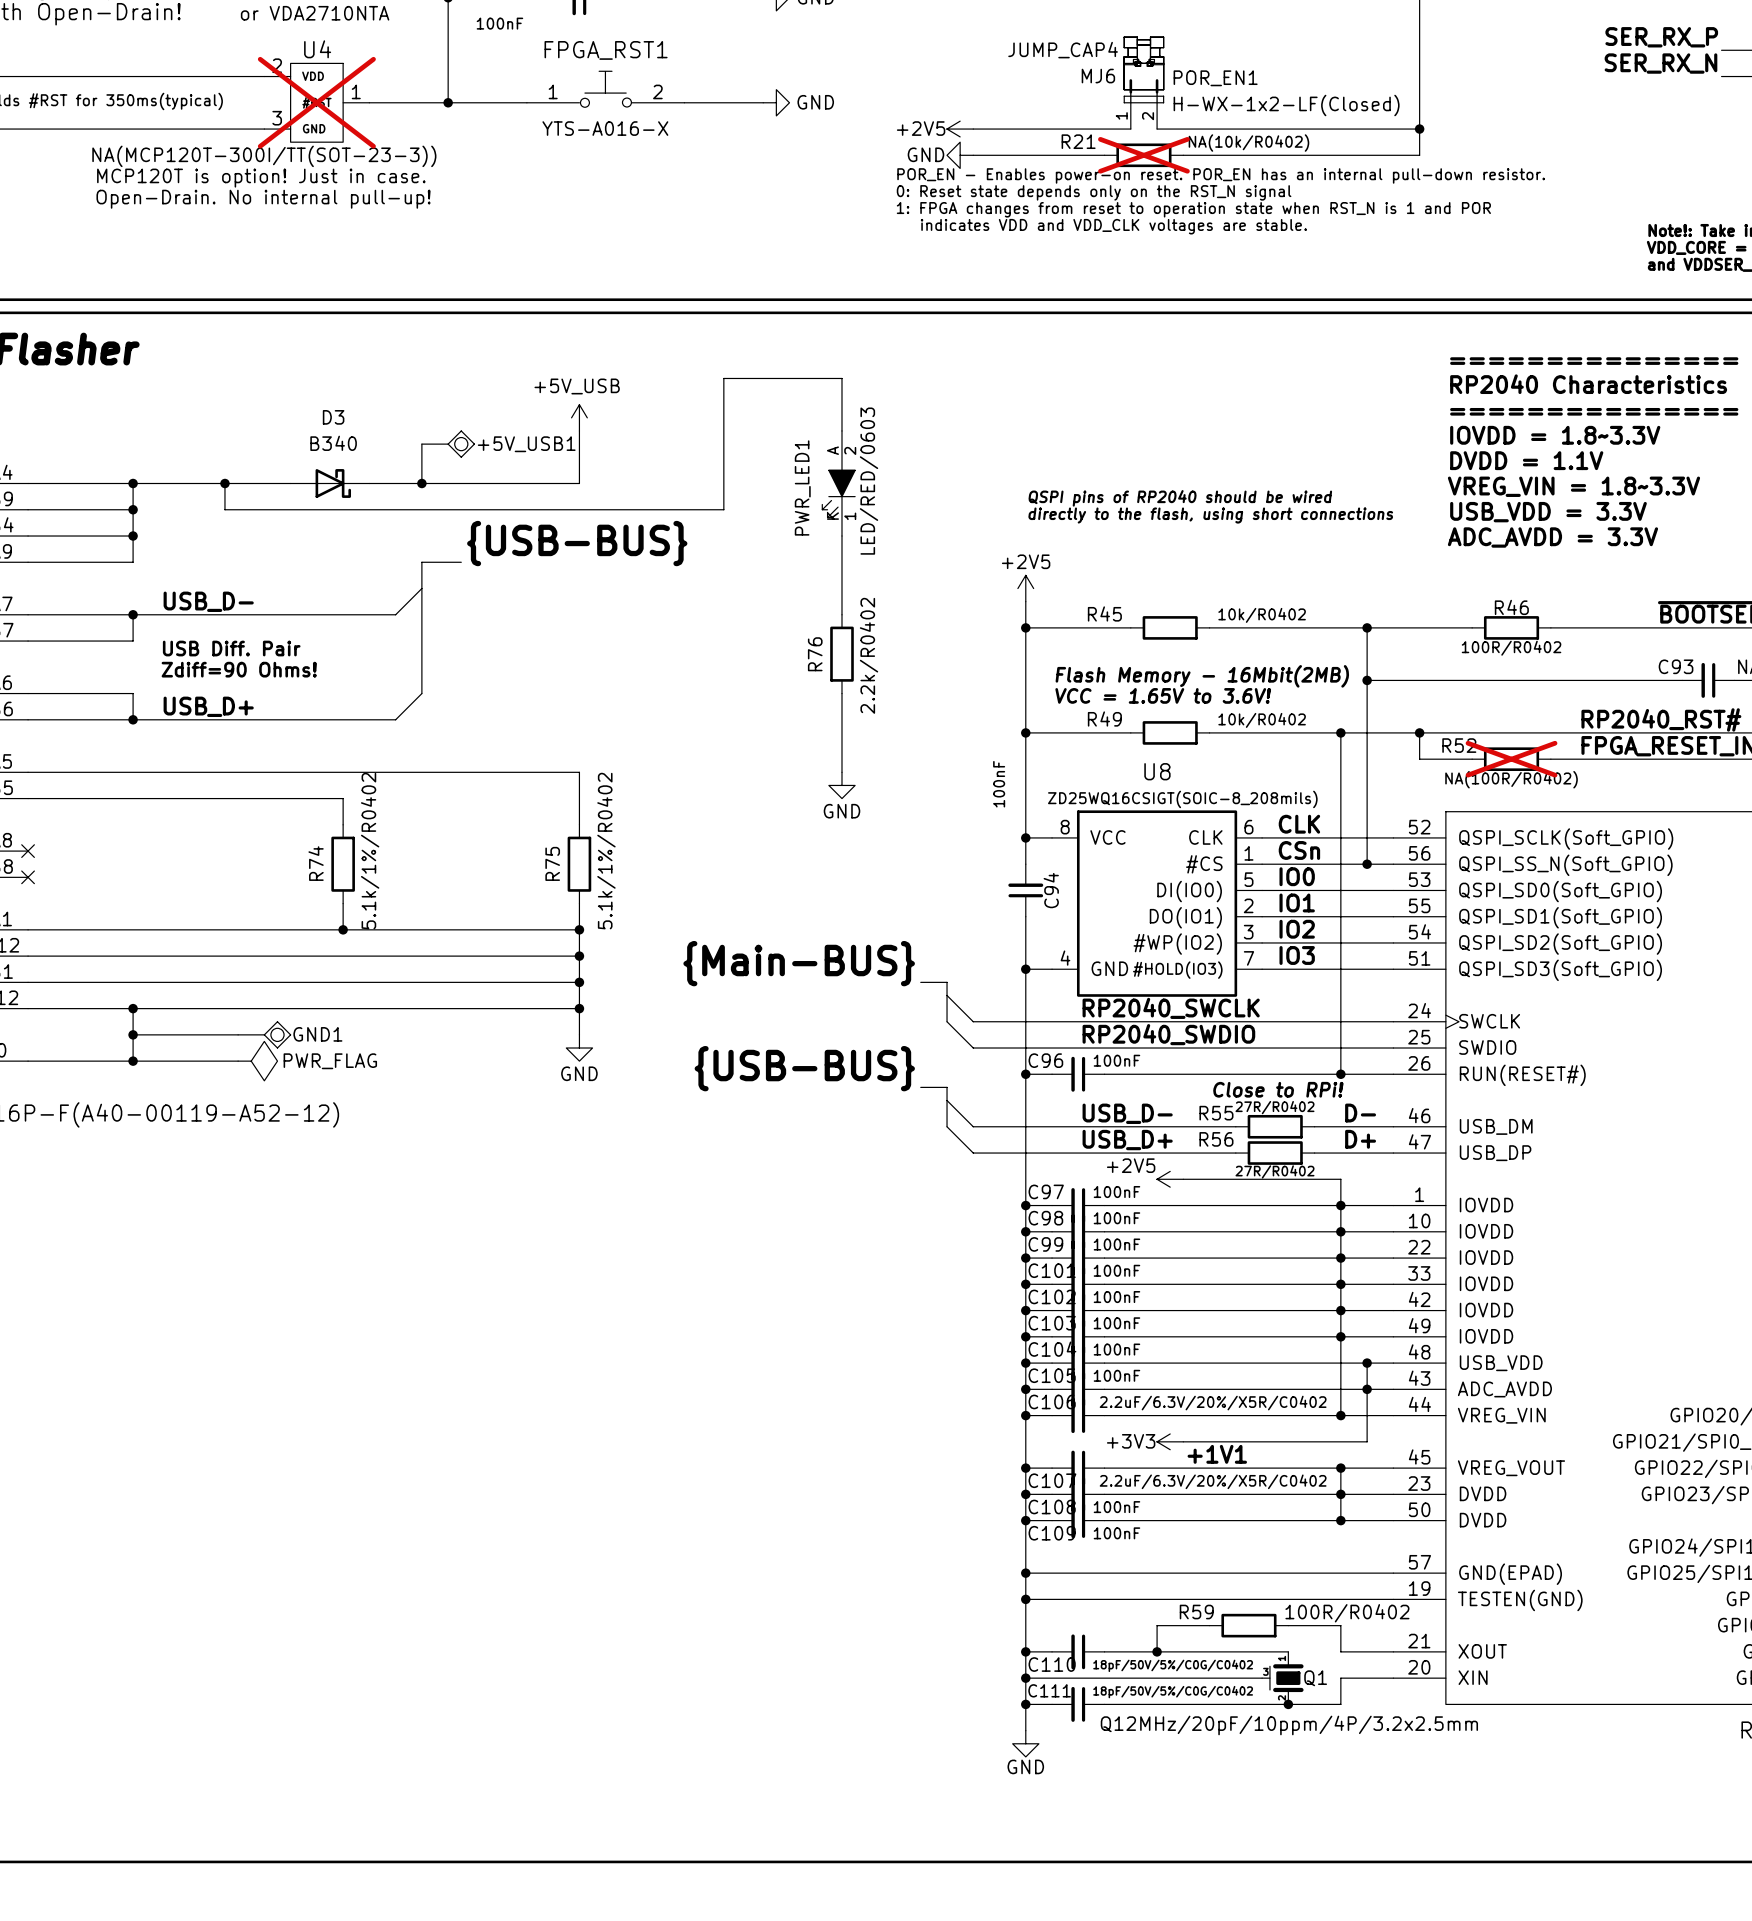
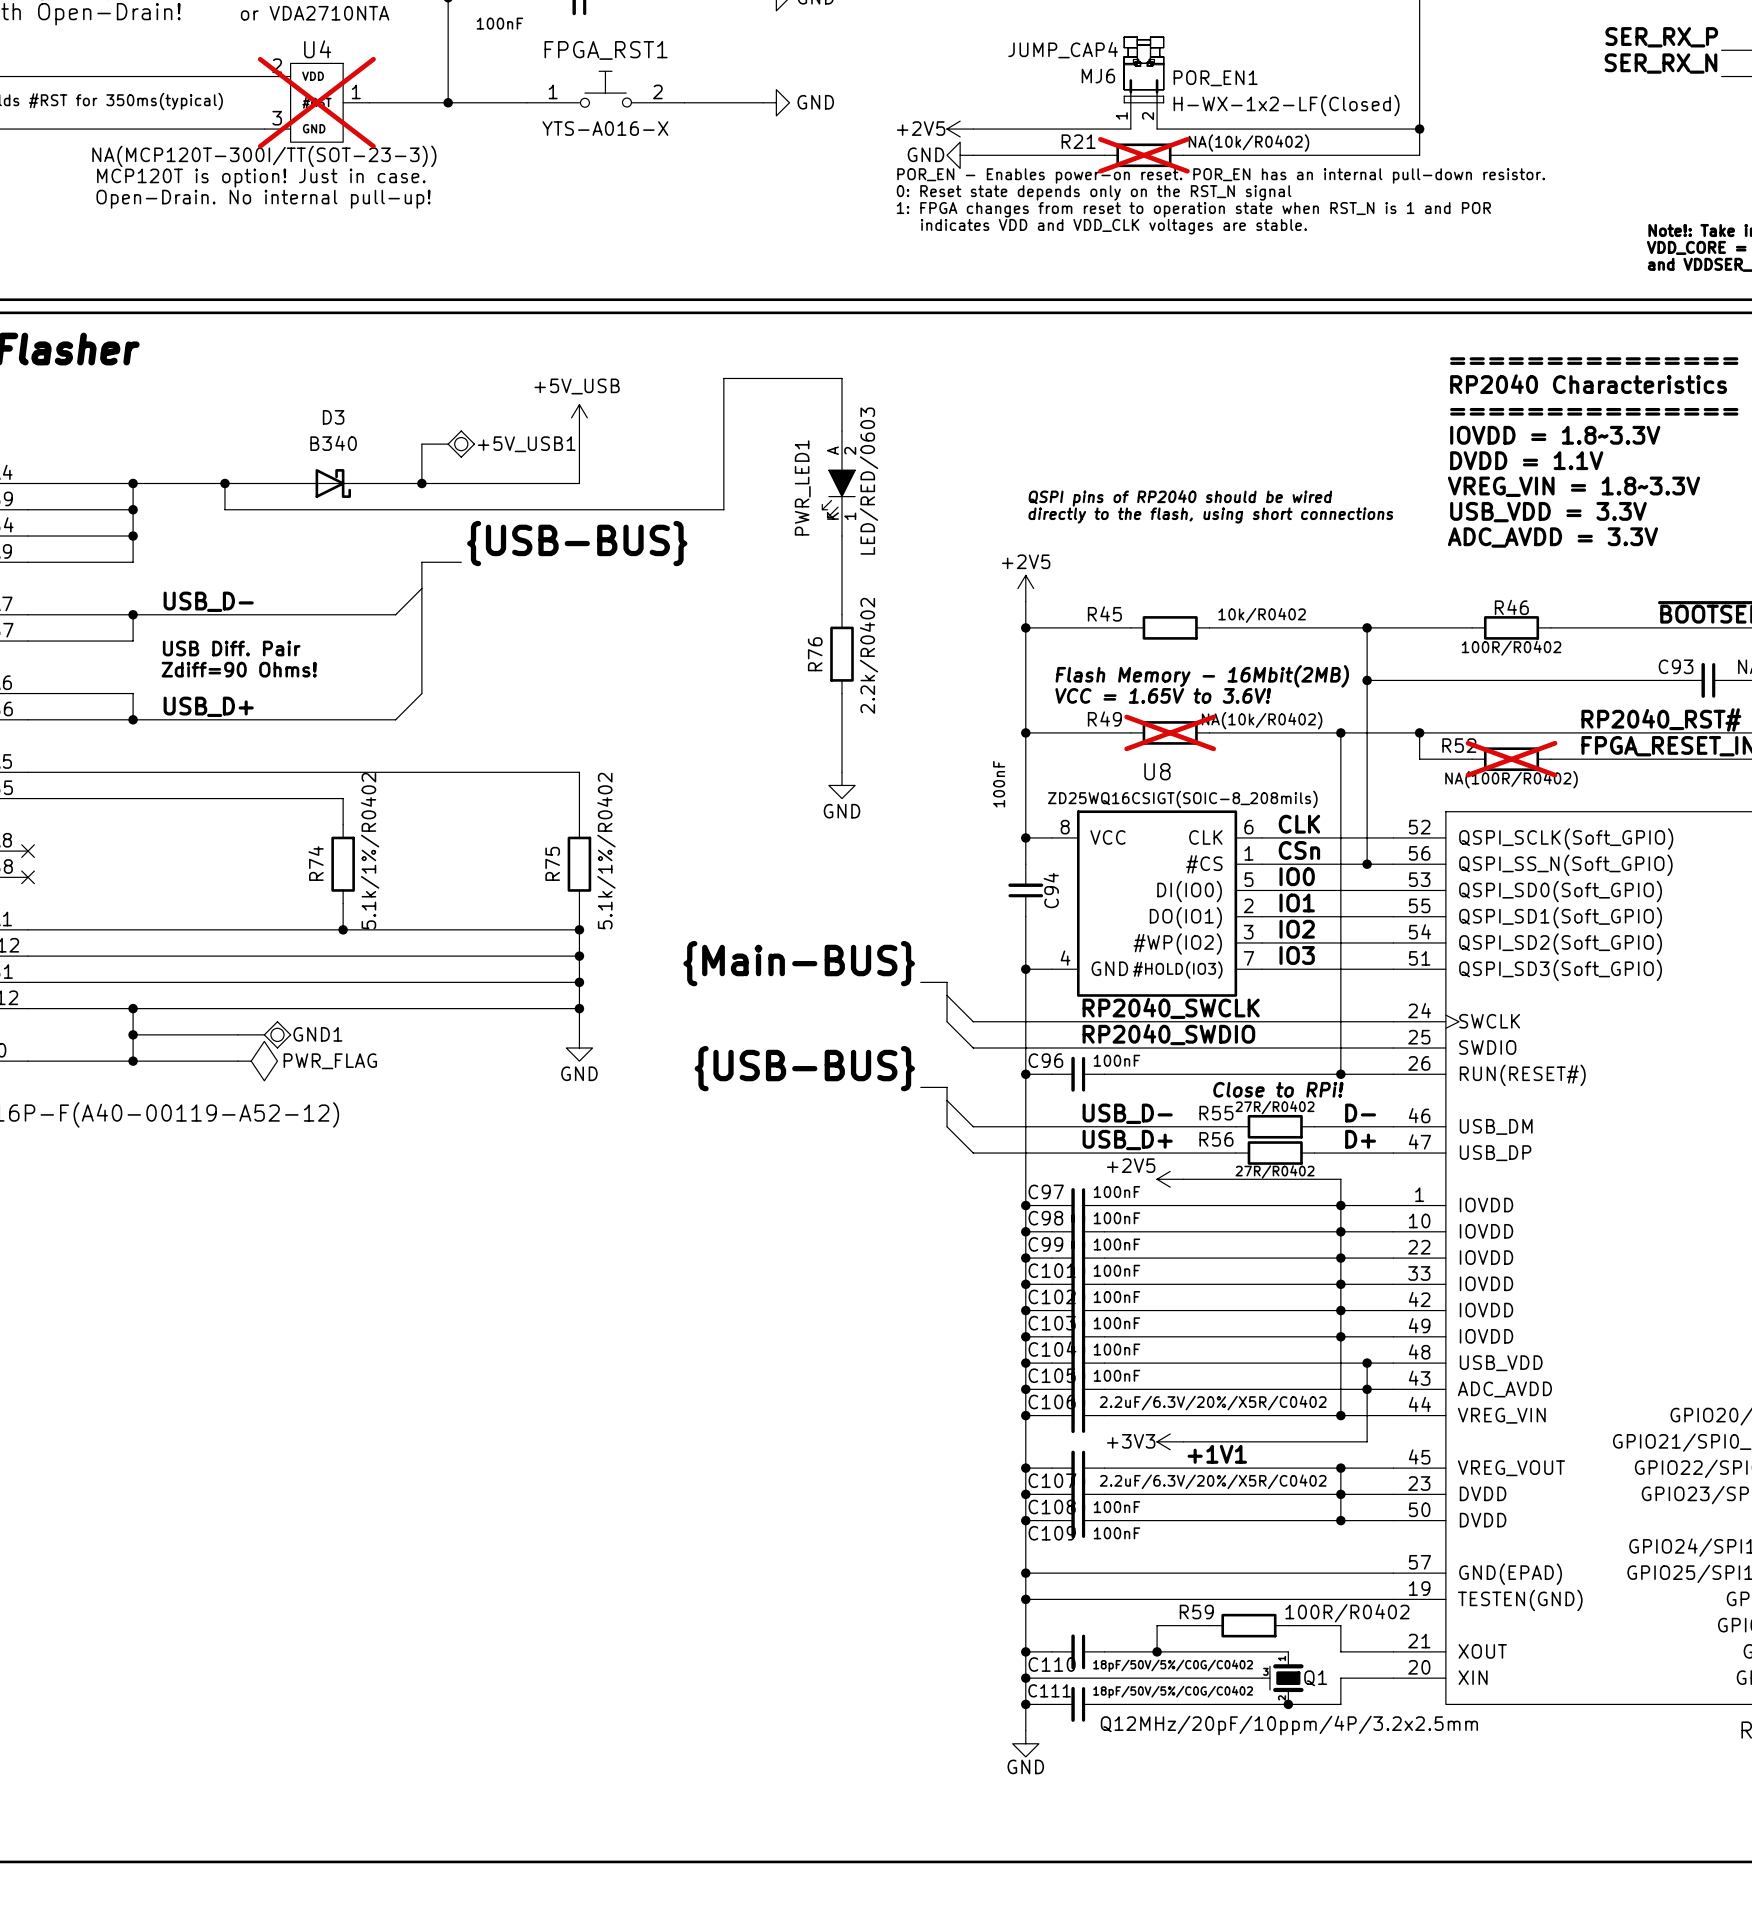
R49 value: 10k/R0402 (1262, 720) -> NA(10k/R0402) (1262, 720)
R49 do-not-place cross: none -> (1170, 732)

